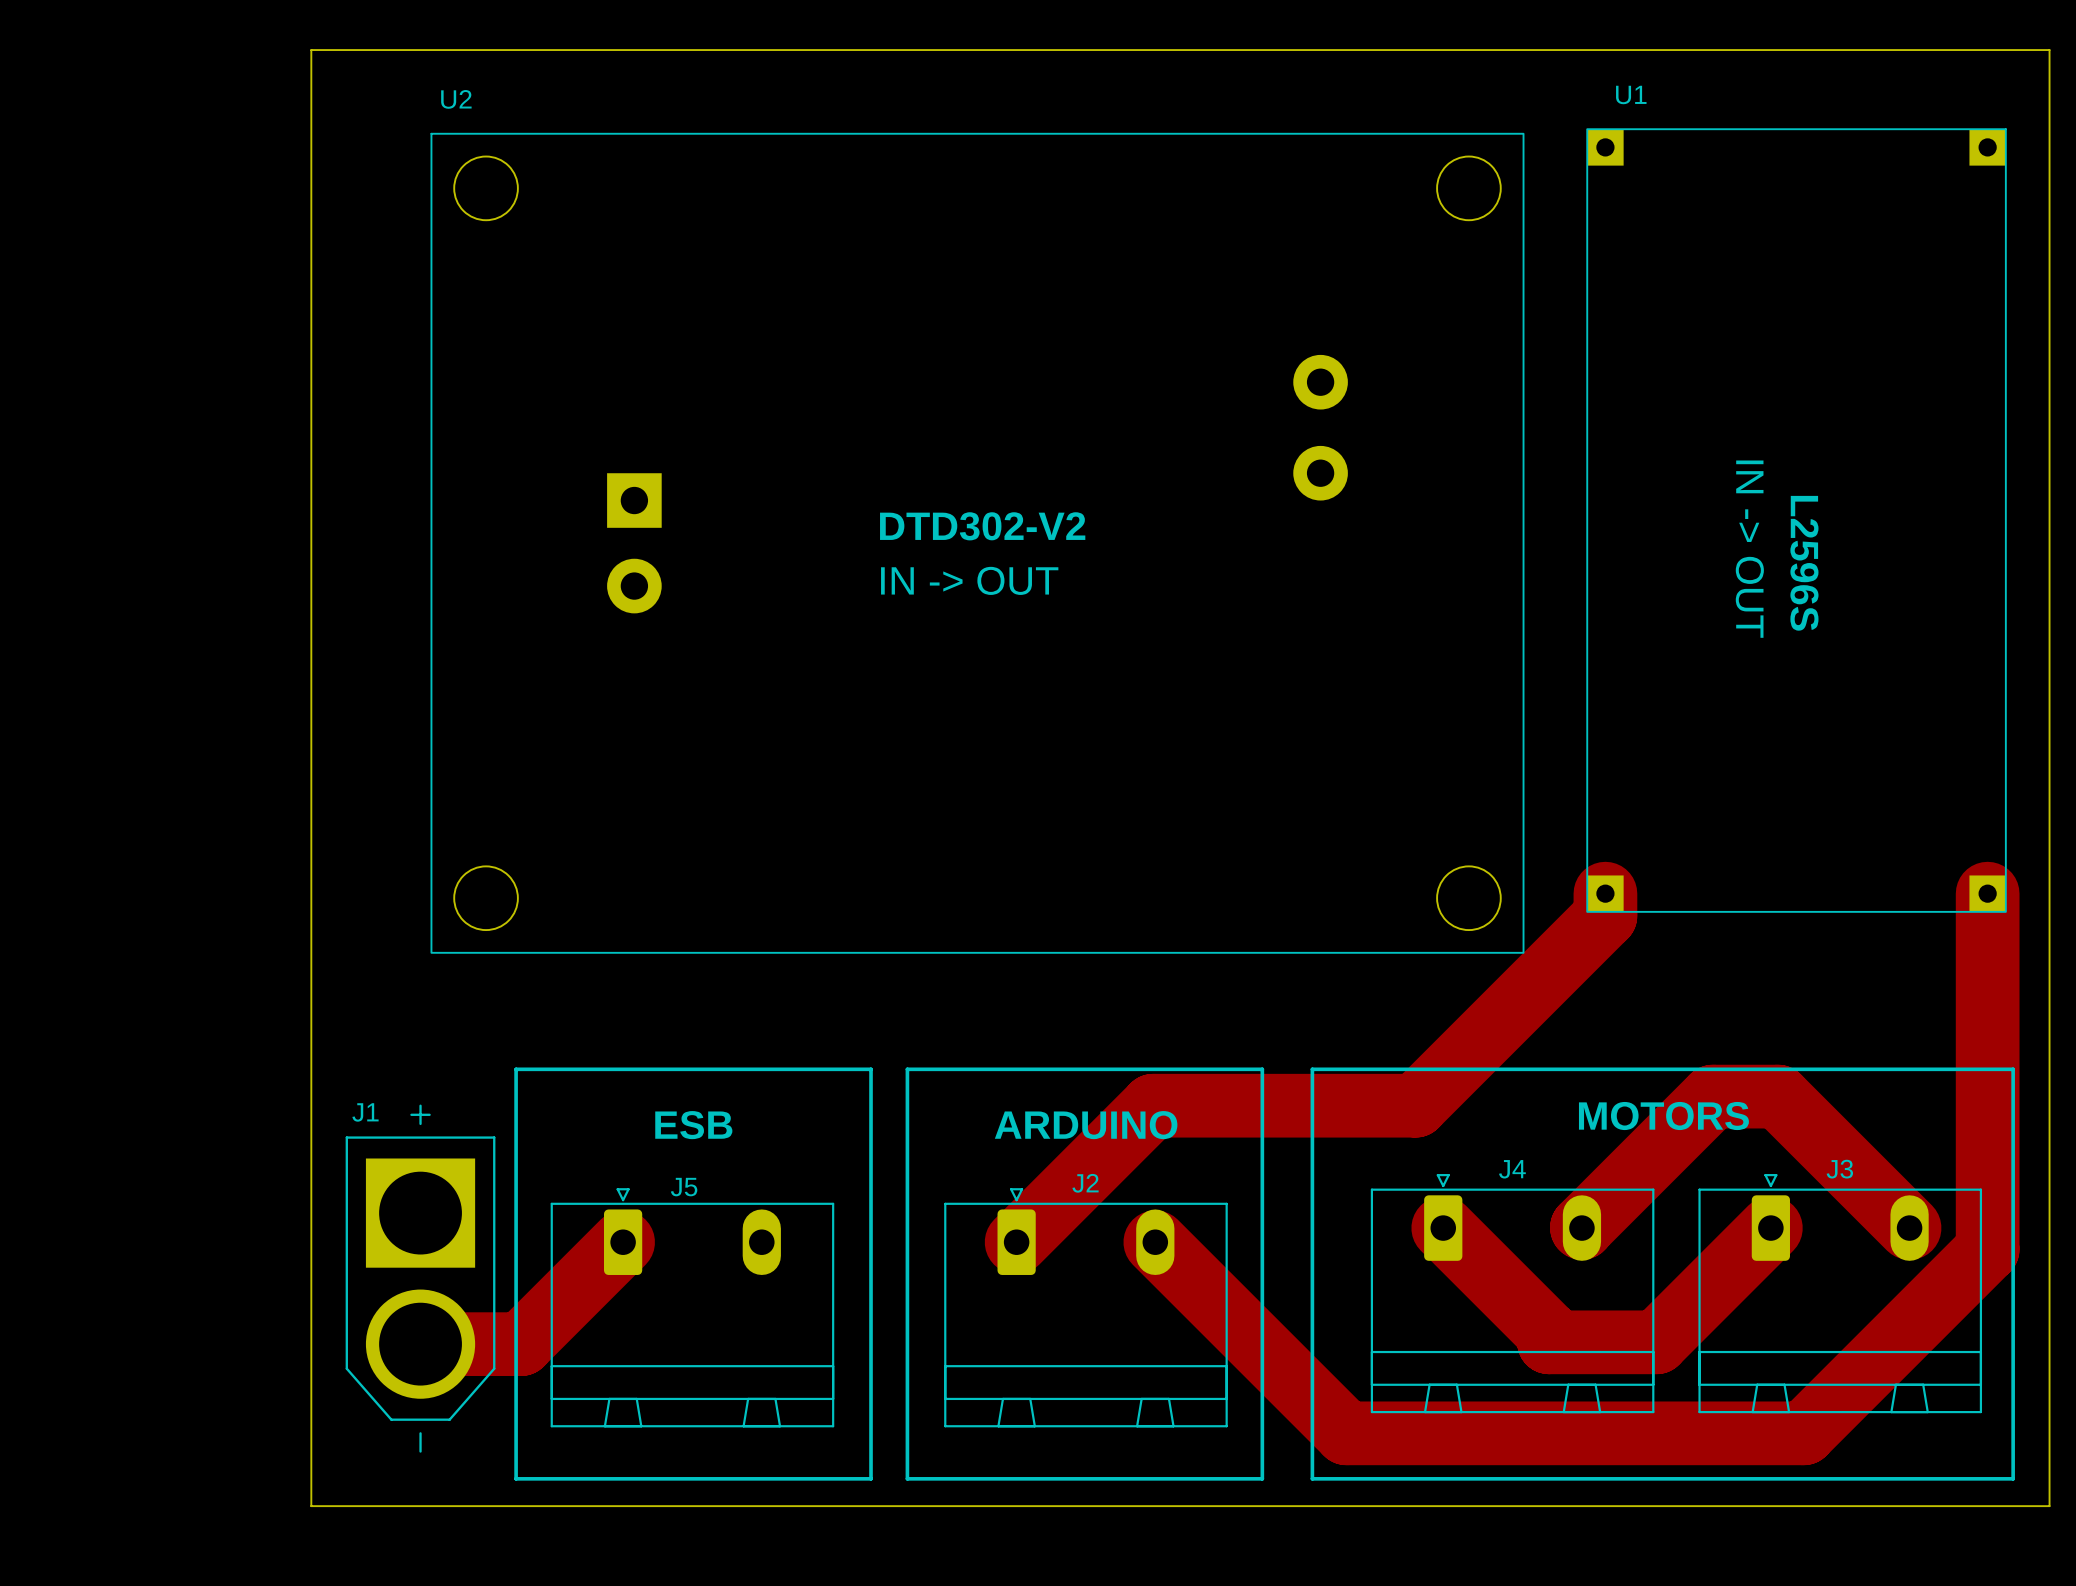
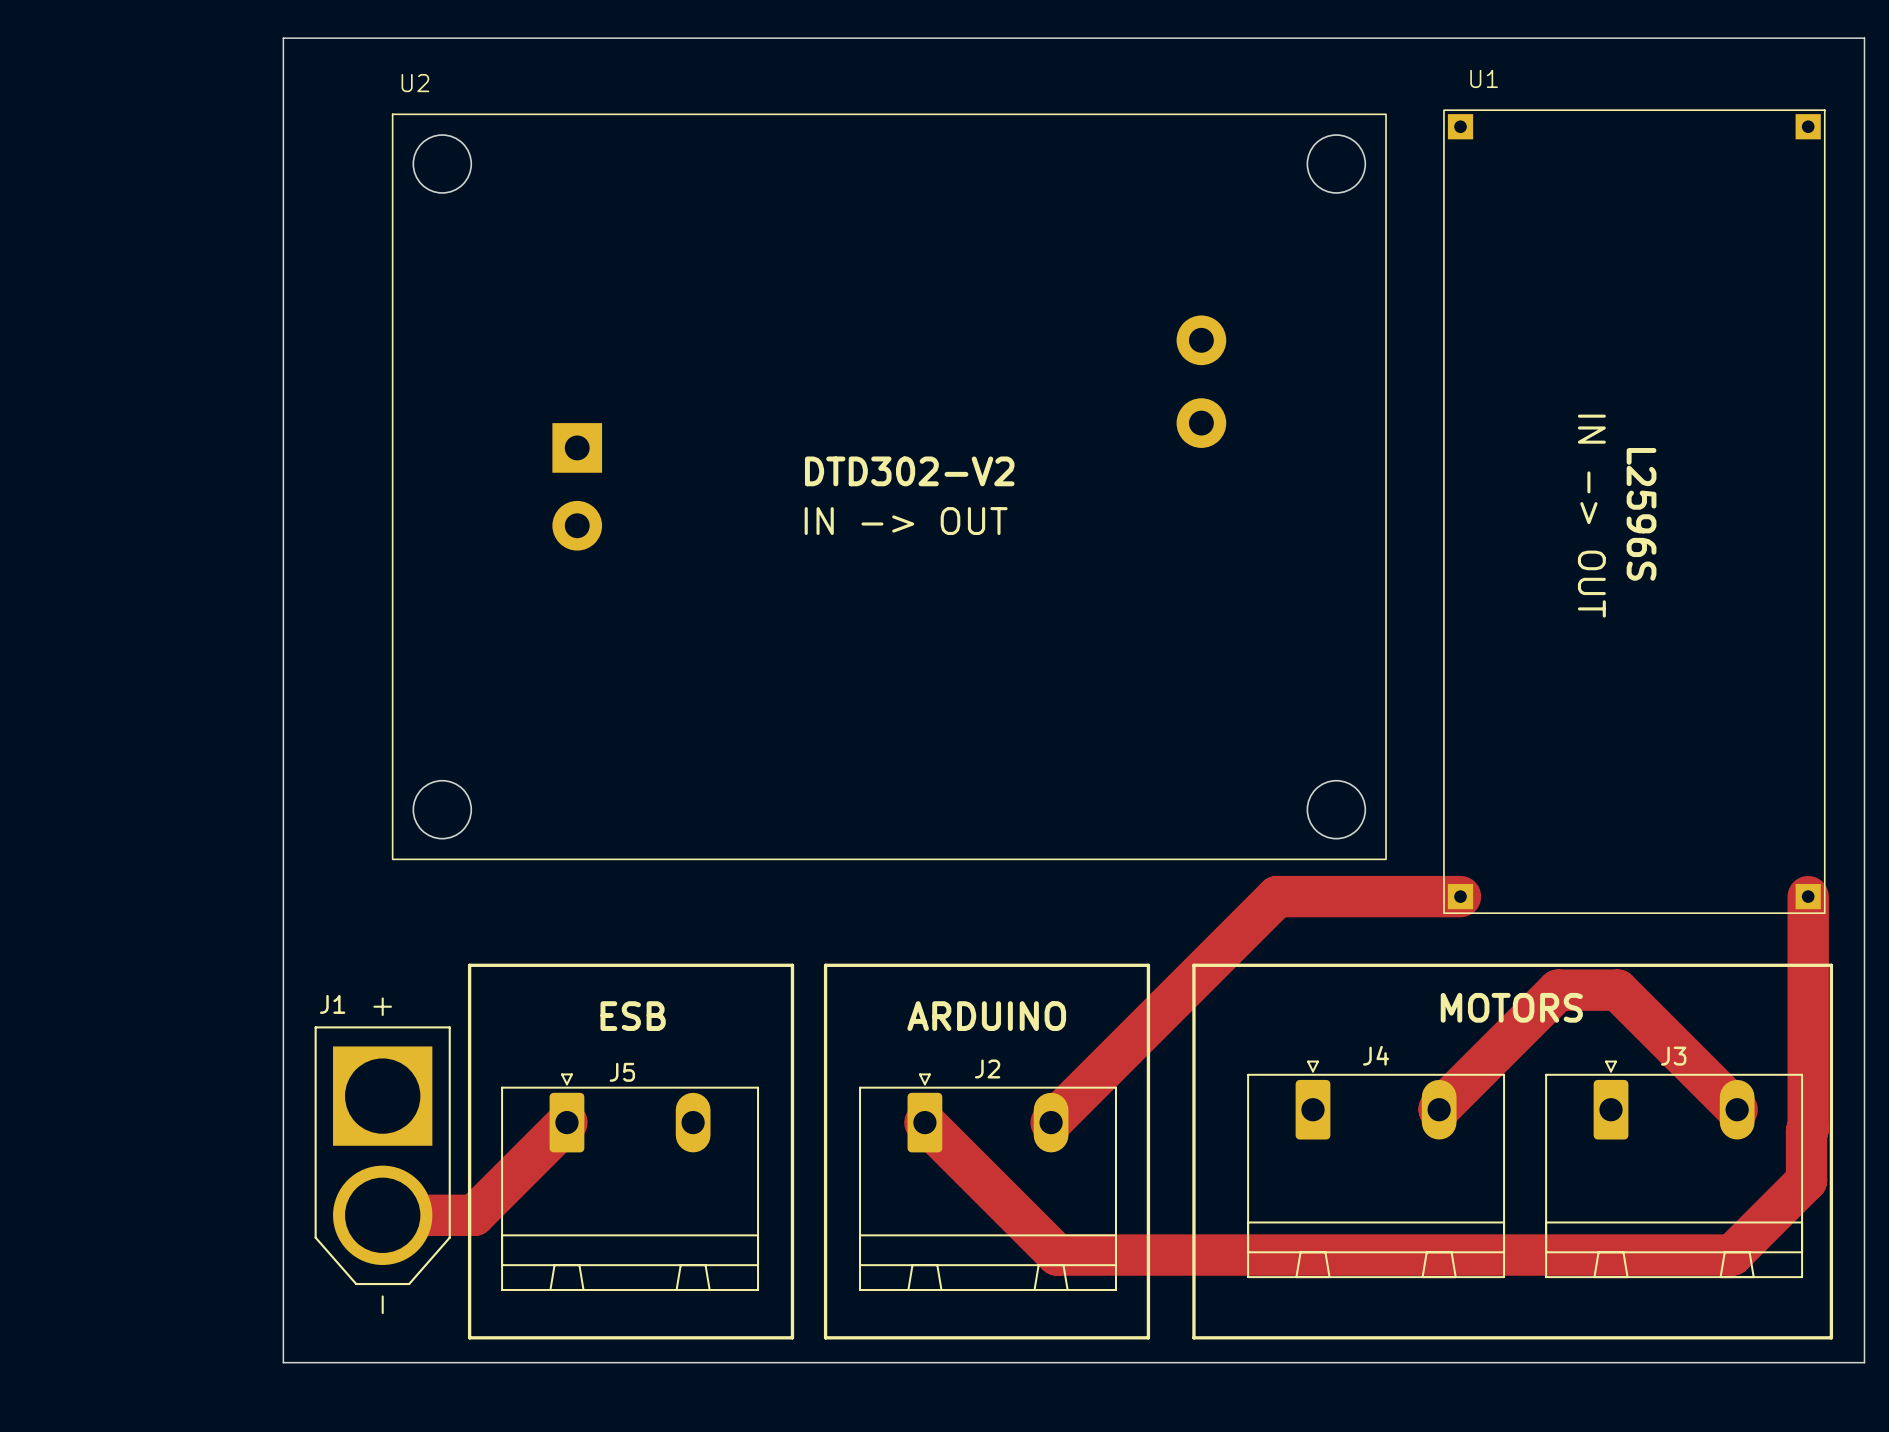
U1 footprint: [1586, 128, 2007, 913] -> [1443, 109, 1826, 914]
track: (1605, 893) (1605, 915) (1415, 1105) (1153, 1105) (1016, 1242) -> none
track: (1987, 893) (1987, 993) -> none
track: none -> (1460, 896) (1277, 896) (1051, 1122)
track width: thick (1987, 993) (1987, 1249) (1985, 1251) -> thin (1808, 896) (1808, 1129) (1806, 1130)
track: (1443, 1228) (1549, 1333) (1549, 1342) (1656, 1342) (1770, 1228) -> none
track width: thick (1581, 1228) (1712, 1096) (1778, 1096) (1909, 1228) -> thin (1439, 1109) (1558, 990) (1617, 990) (1737, 1109)
track width: thick (623, 1242) (521, 1344) (420, 1344) -> thin (566, 1122) (474, 1215) (382, 1215)
track: (1155, 1242) (1346, 1433) (1803, 1433) (1985, 1251) -> (924, 1122) (1057, 1255) (1732, 1255) (1806, 1180) (1806, 1130)

